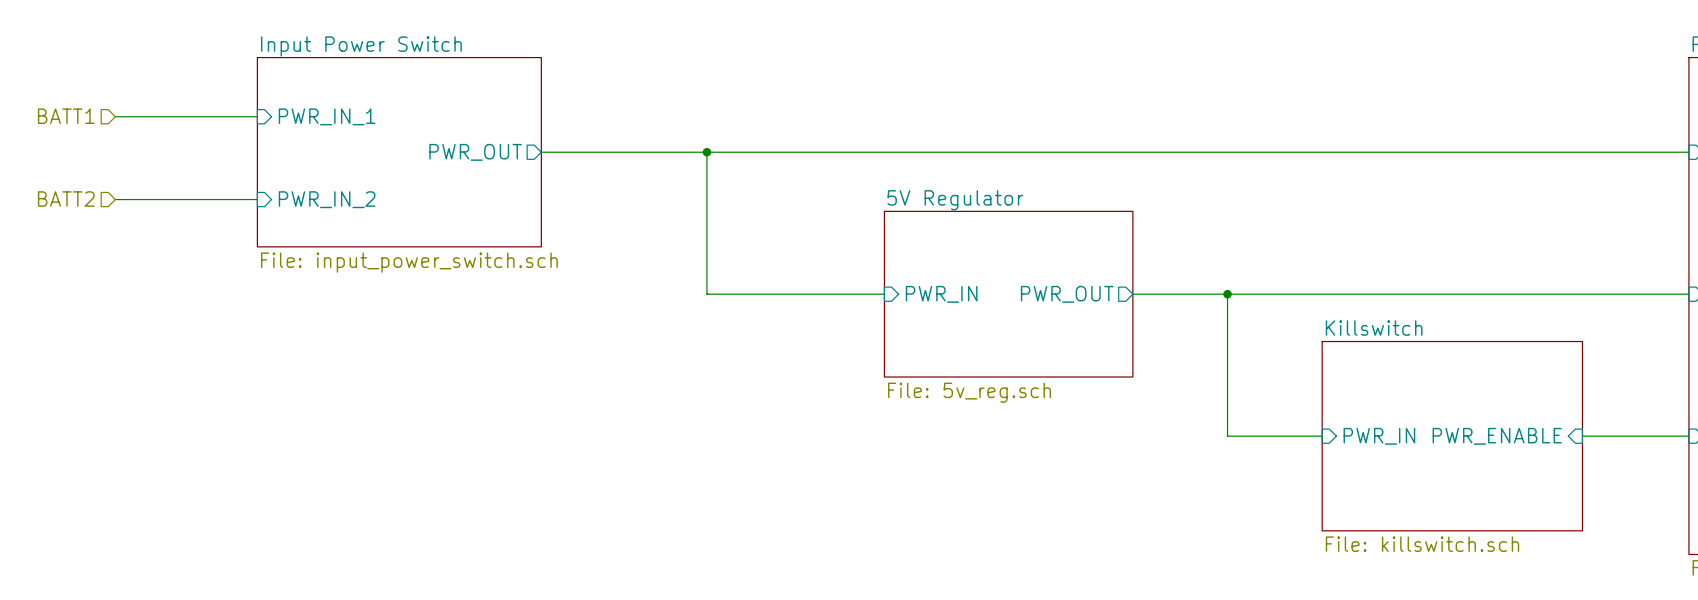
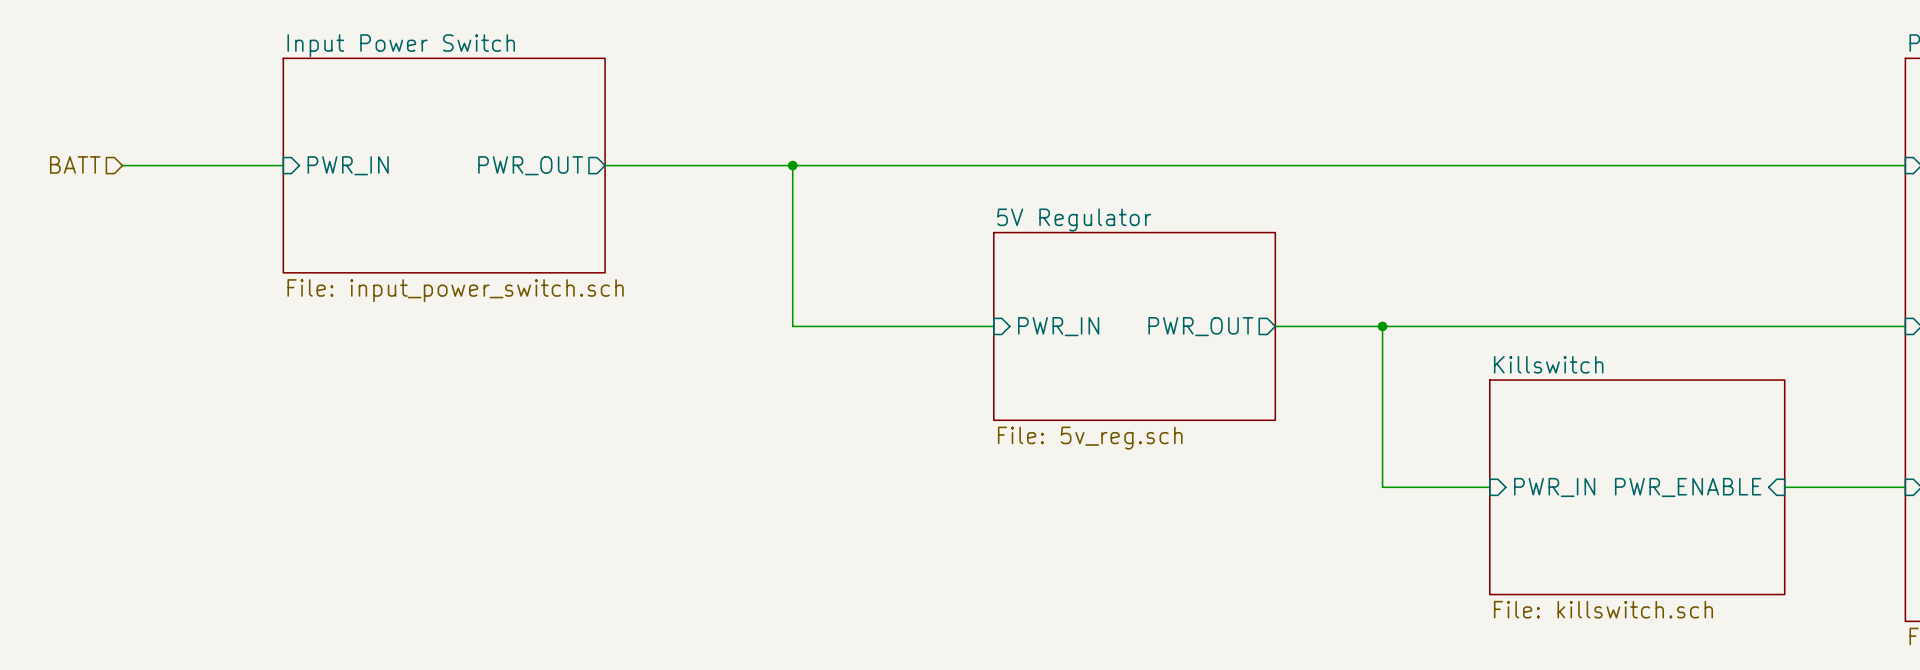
hierarchical label: BATT1 (66, 116) -> none
wire: (115, 116) (257, 116) -> (122, 165) (283, 165)
sheet pin: PWR_IN_1 (327, 116) -> none
hierarchical label: none -> BATT (75, 164)
sheet pin: none -> PWR_IN (348, 165)
hierarchical label: BATT2 (66, 199) -> none
wire: (115, 199) (257, 199) -> none
sheet pin: PWR_IN_2 (327, 199) -> none

